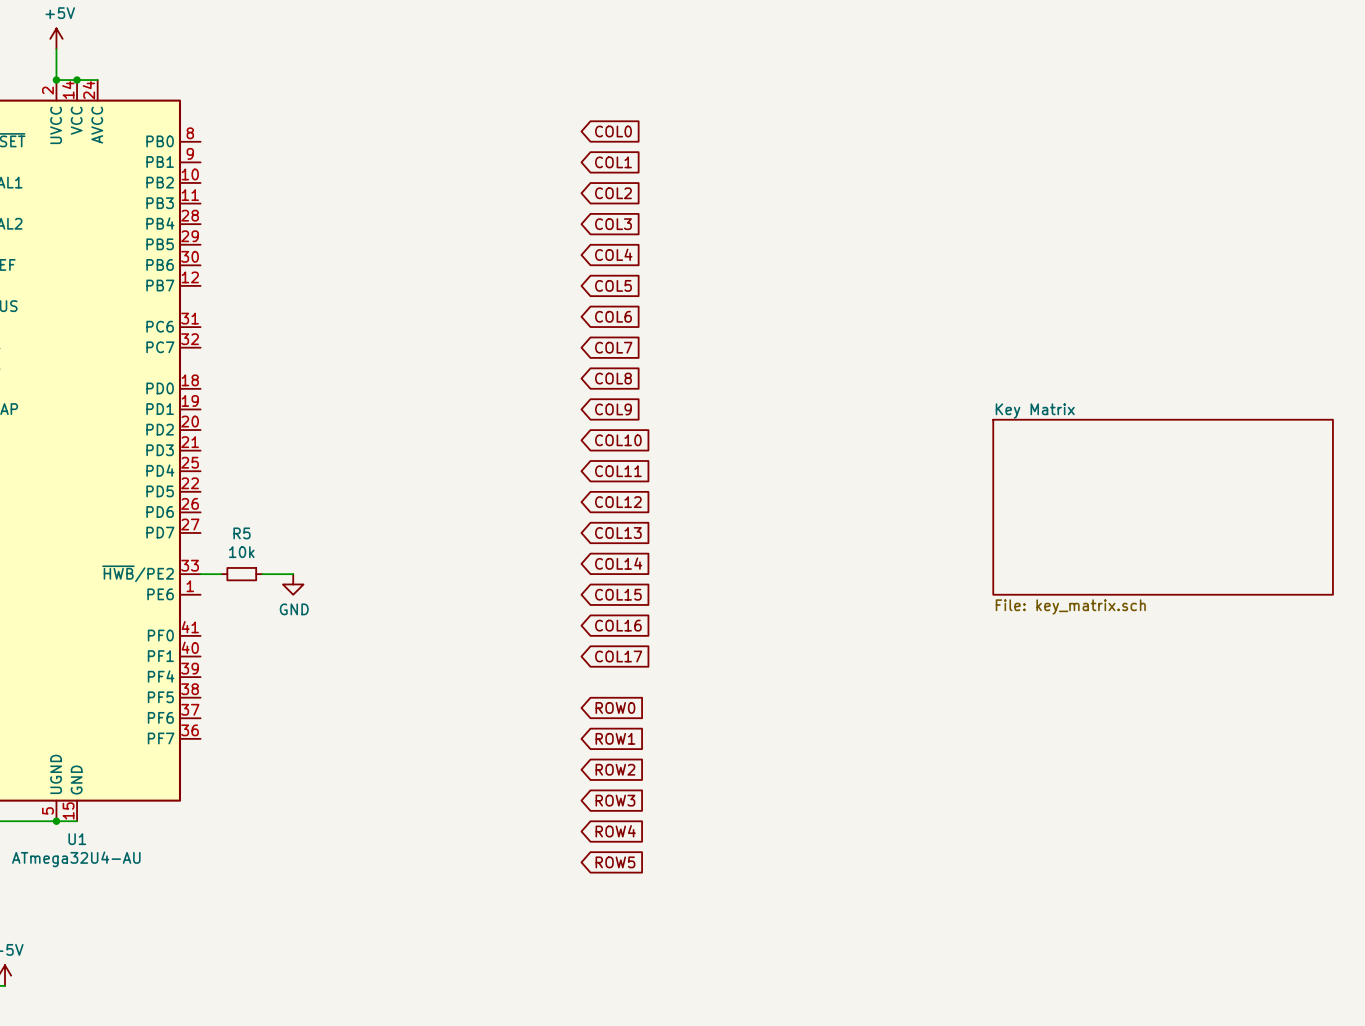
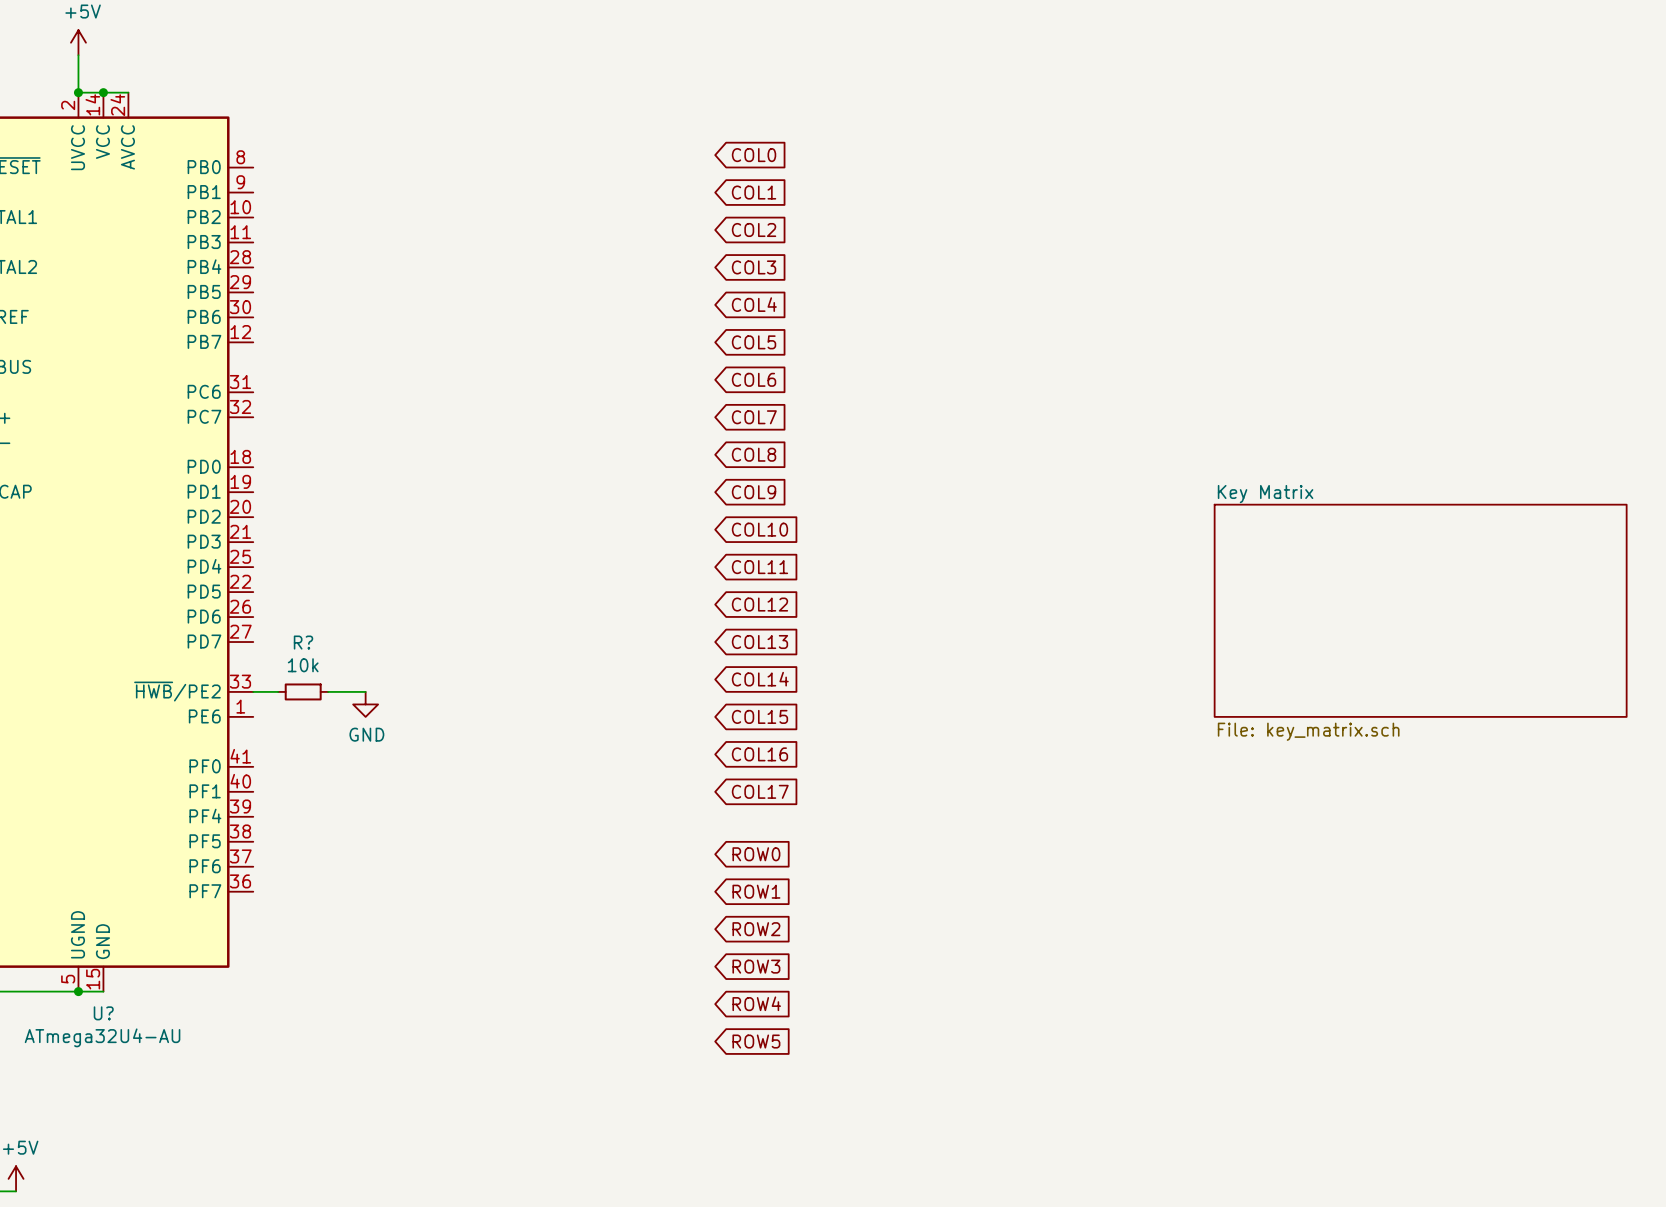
R5 name: R5 (242, 533) -> R? (303, 642)
U1 name: U1 (77, 839) -> U? (103, 1013)

